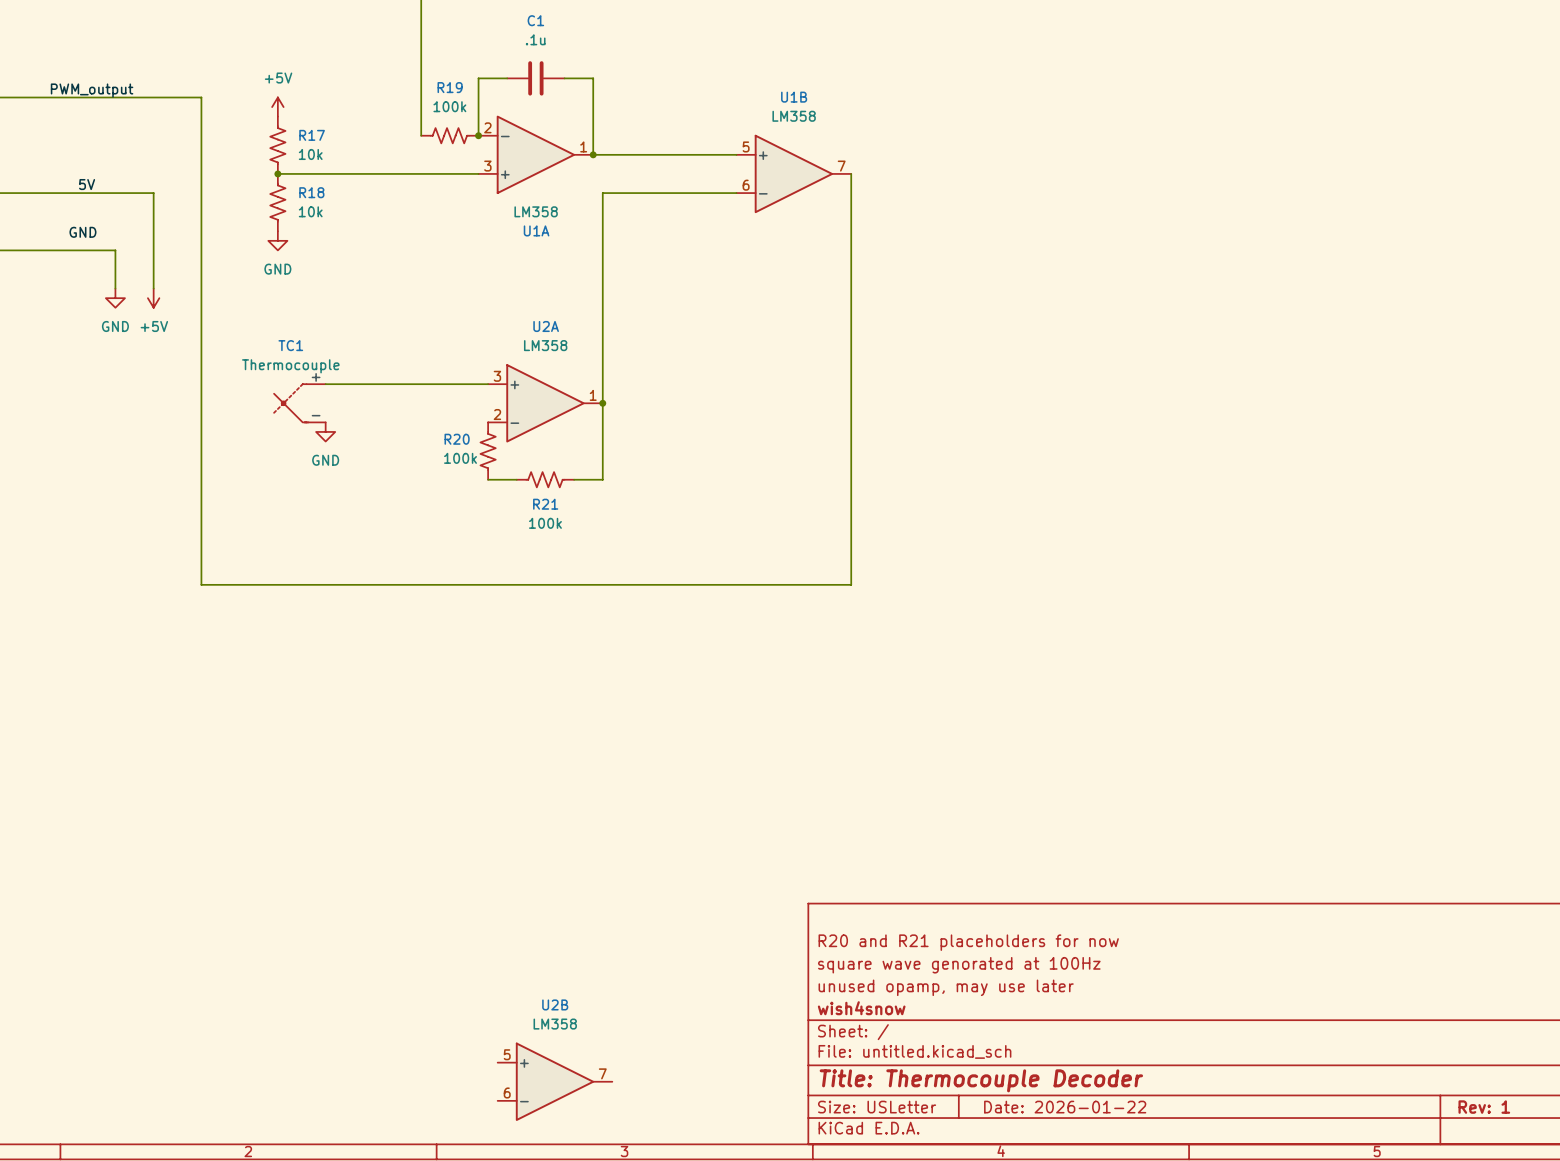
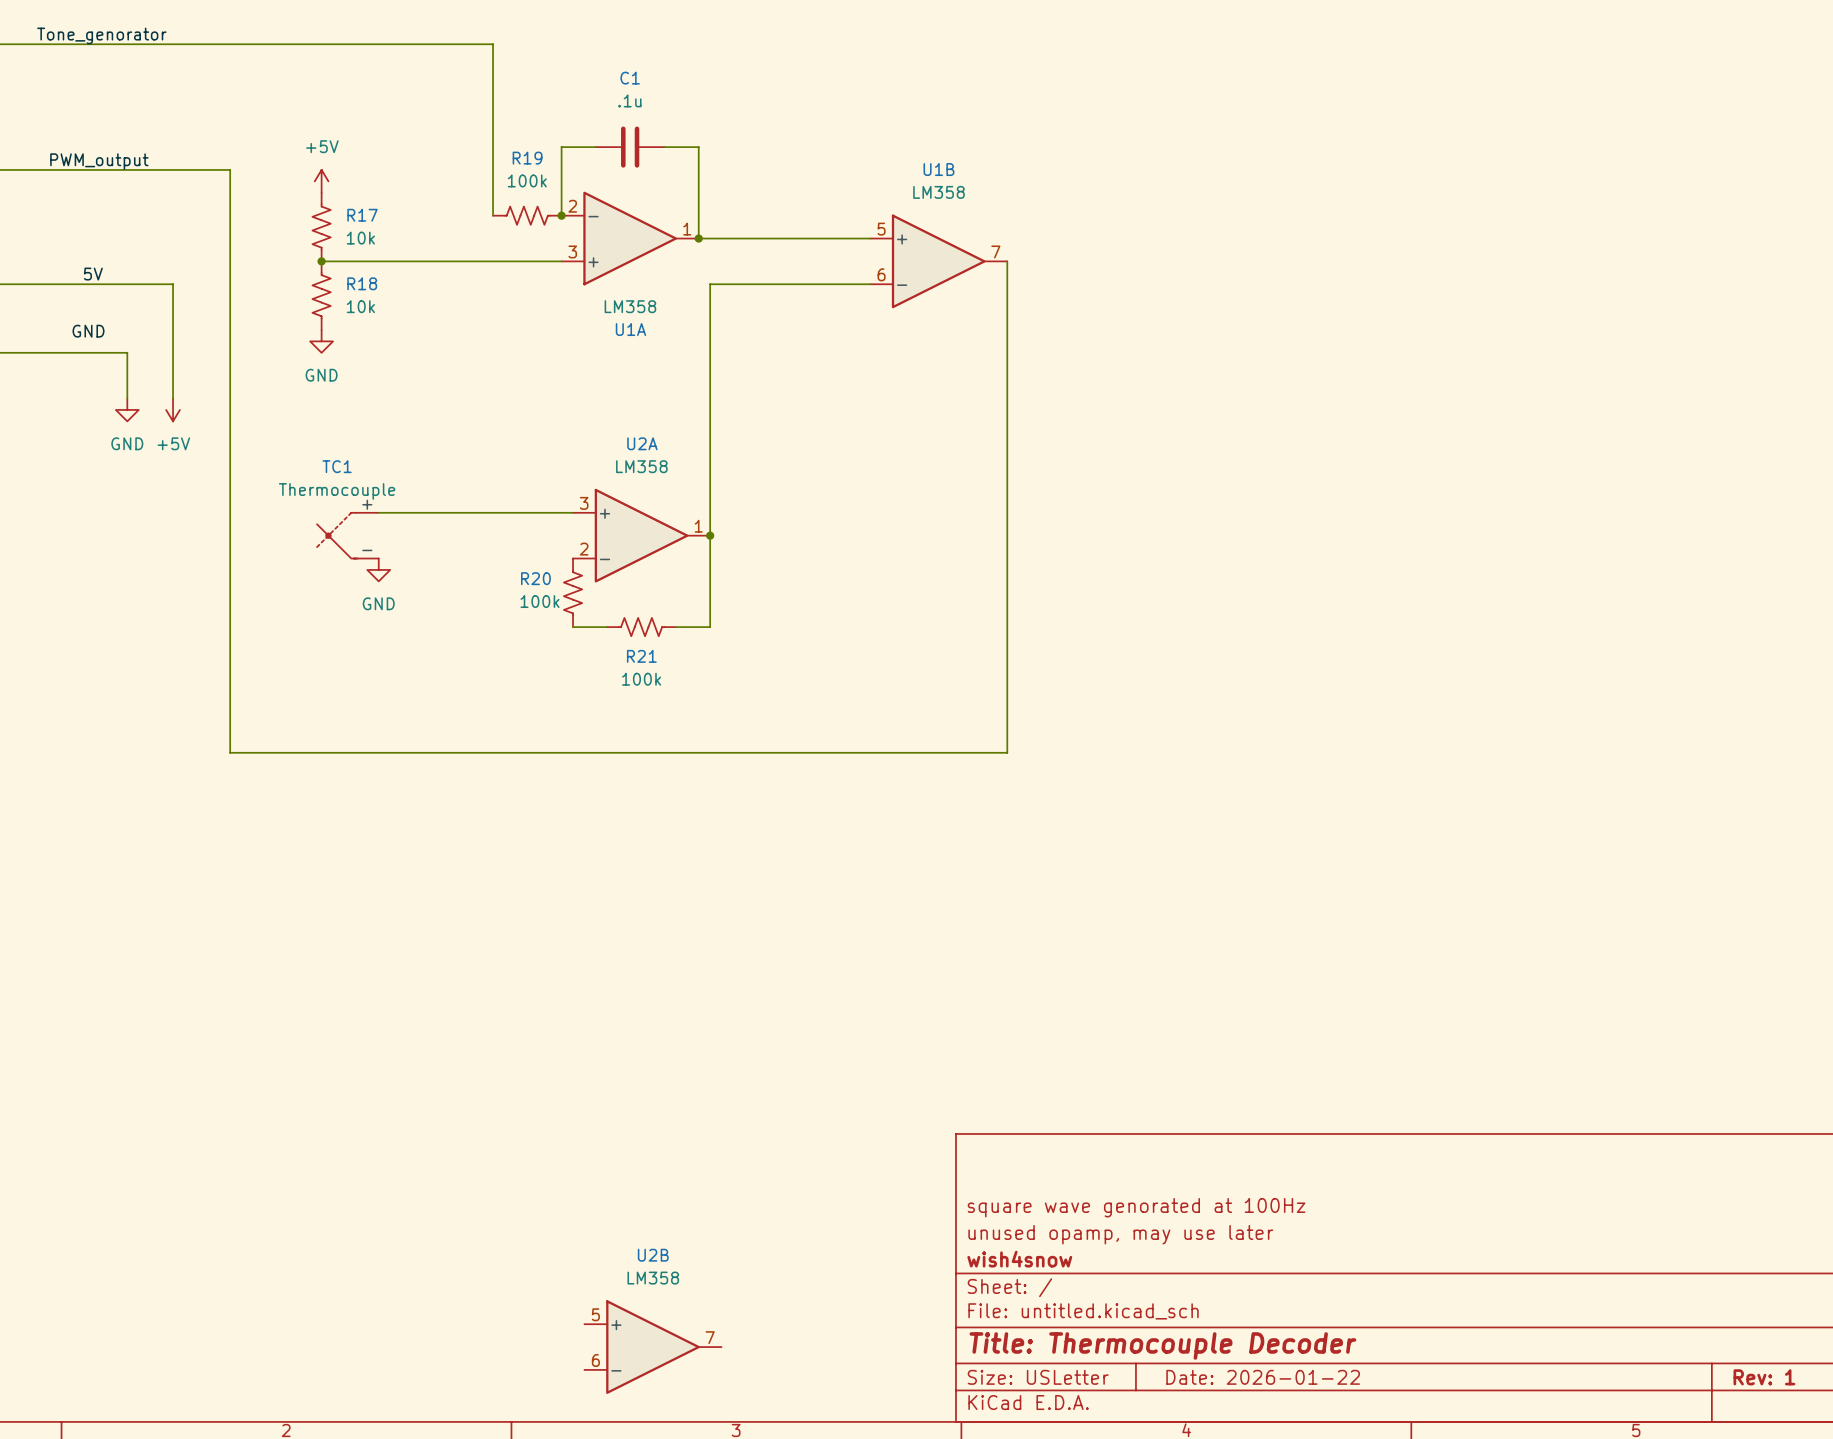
title block: R20 and R21 placeholders for now (968, 942) -> none

